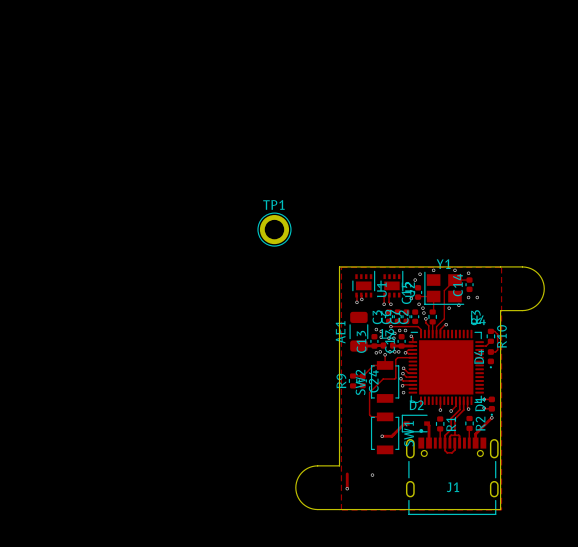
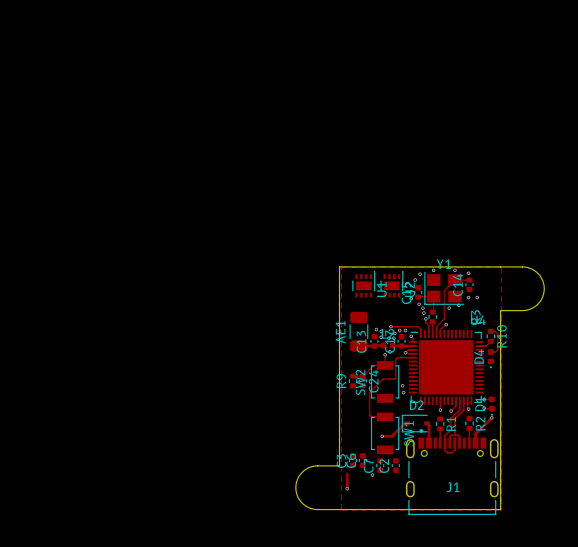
TP1: (274, 229) -> none
track: (356, 295) (356, 302) -> none
track: (361, 295) (361, 299) -> none
track: (384, 295) (384, 304) -> none
track: (389, 295) (388, 302) (390, 304) -> none
via: (361, 299) -> none
via: (356, 302) -> none
via: (384, 304) -> none
via: (390, 304) -> none
C3 position: (388, 316) -> (353, 460)
C6 position: (397, 316) -> (362, 460)
C7 position: (406, 316) -> (380, 465)
C2 position: (415, 316) -> (395, 465)
via: (380, 351) -> none
via: (394, 351) -> none
via: (398, 351) -> none
via: (376, 352) -> none
track: (403, 368) (408, 373) (412, 373) -> none
via: (403, 368) -> none
track: (402, 373) (406, 377) (412, 377) -> none
via: (402, 373) -> none
track: (400, 378) (403, 380) (412, 380) -> none
via: (400, 378) -> none
track: (412, 384) (402, 385) -> none

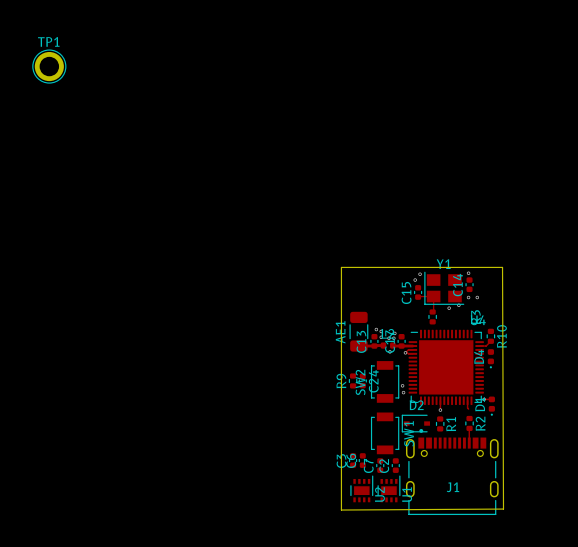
TP1: none -> (49, 66)
board edge: (339, 266) (339, 465) (315, 466) (303, 471) (295, 485) (299, 500) (307, 507) (317, 509) (500, 509) (500, 310) (525, 310) (535, 306) (543, 294) (544, 285) (541, 277) (533, 269) (522, 266) (339, 266) -> (341, 267) (341, 510) (503, 509) (502, 267) (341, 267)
zone outline: (341, 267) (341, 510) (501, 510) (501, 267) (341, 267) -> none
via: (433, 270) -> none
via: (454, 270) -> none
track: (469, 280) (454, 280) (444, 290) (444, 318) (436, 326) (436, 334) -> none
U1 position: (363, 284) -> (388, 488)
U2 position: (391, 284) -> (361, 488)
via: (411, 298) -> none
via: (419, 304) -> none
via: (422, 308) -> none
via: (423, 313) -> none
track: (425, 318) (425, 322) (428, 325) (428, 334) -> none
via: (425, 318) -> none
track: (432, 321) (432, 334) -> none
track: (446, 324) (440, 329) (440, 334) -> none
via: (446, 324) -> none
track: (390, 326) (418, 326) (421, 329) (421, 334) -> none
via: (390, 326) -> none
via: (399, 330) -> none
via: (405, 330) -> none
track: (490, 331) (494, 331) (497, 334) (497, 349) (490, 352) -> none
track: (411, 336) (412, 342) -> none
via: (411, 336) -> none
track: (385, 354) (385, 365) (373, 365) (362, 376) (353, 376) -> none
via: (385, 354) -> none
track: (412, 357) (397, 357) (395, 359) (395, 378) (383, 379) (369, 392) (369, 414) (371, 416) (385, 416) -> none
track: (455, 400) (455, 406) (451, 411) -> none
track: (459, 400) (459, 409) (451, 418) (451, 429) (445, 435) (445, 450) (452, 452) (454, 449) (454, 443) -> none
track: (463, 400) (463, 410) (454, 418) (454, 435) -> none
track: (484, 408) (491, 408) -> none
via: (484, 408) -> none
via: (468, 409) -> none
via: (451, 411) -> none
track: (491, 417) (475, 434) (475, 443) -> none
via: (491, 417) -> none
track: (406, 423) (391, 436) (382, 436) -> none
track: (427, 423) (429, 425) (429, 443) -> none
track: (440, 428) (440, 443) -> none
via: (382, 436) -> none
track: (449, 443) (451, 435) (458, 435) (459, 443) -> none
track: (347, 473) (347, 488) -> none
via: (372, 475) -> none
via: (347, 488) -> none

